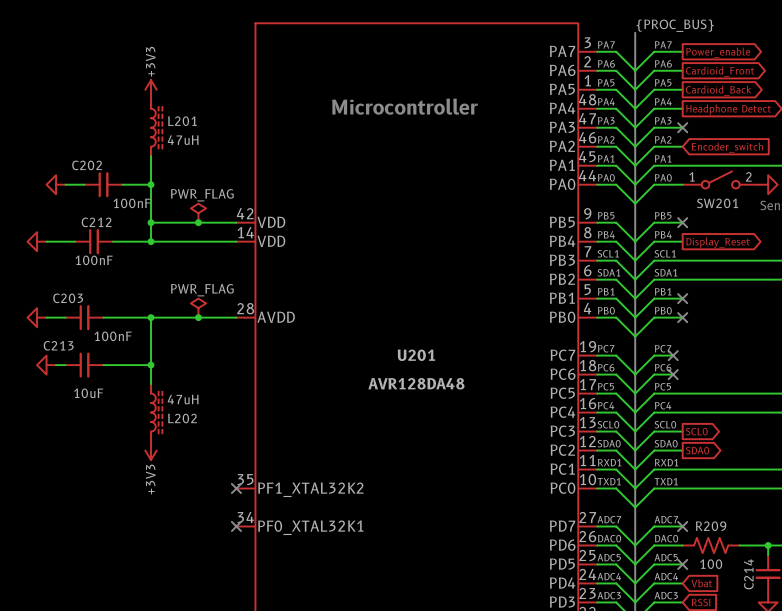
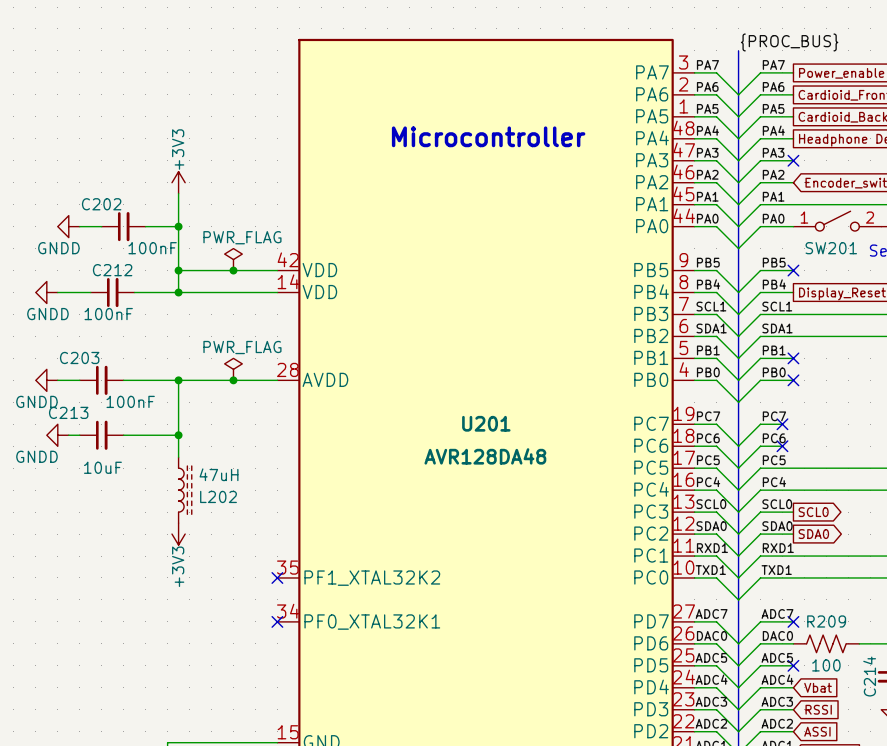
power symbol position: +3V3 (151, 89) -> +3V3 (178, 182)
L201: 47uH (156, 127) -> none
power symbol text: none -> GNDD (58, 248)
power symbol text: none -> GNDD (47, 314)
power symbol text: none -> GNDD (36, 401)
power symbol text: none -> GNDD (36, 456)

